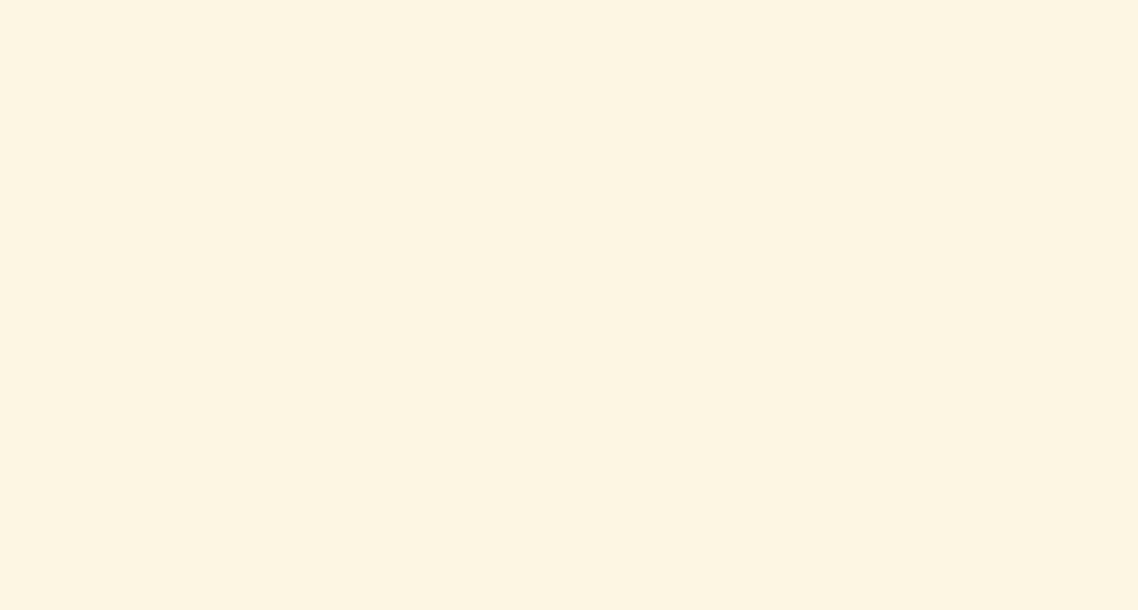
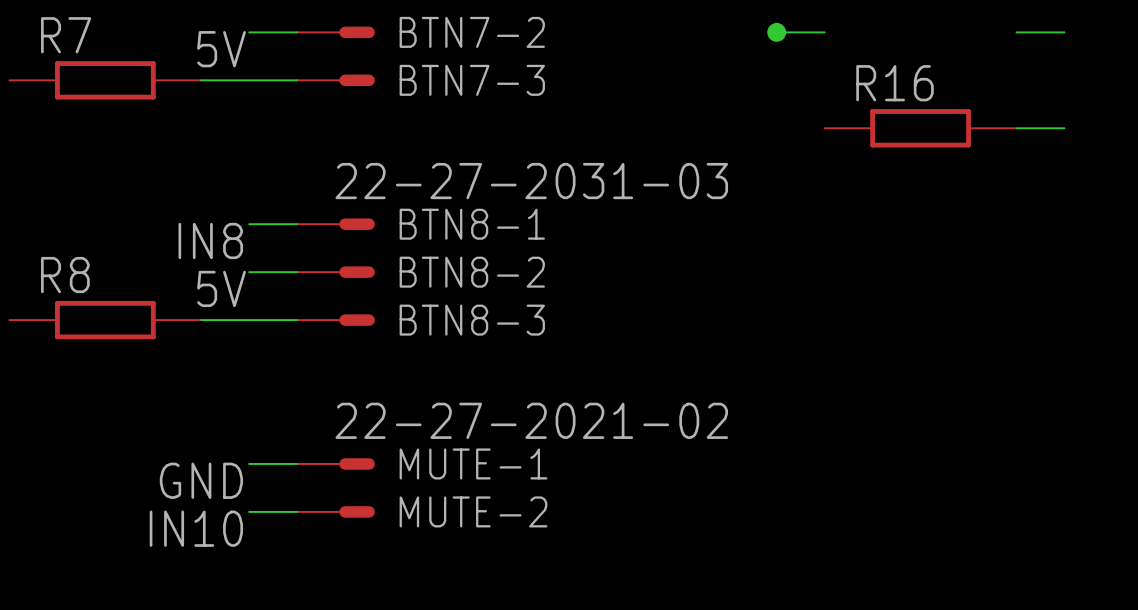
wire: none -> (249, 32) (297, 32)
BTN7-2: none -> (336, 32)
wire: none -> (776, 32) (824, 32)
junction: none -> (776, 32)
wire: none -> (1016, 32) (1064, 32)
label: none -> 5V (221, 49)
R7: none -> (105, 80)
wire: none -> (201, 80) (297, 80)
BTN7-3: none -> (336, 80)
R16: none -> (920, 128)
wire: none -> (1016, 128) (1064, 128)
wire: none -> (249, 224) (297, 224)
BTN8-1: none -> 22-27-2031-03 (336, 224)
label: none -> IN8 (210, 240)
wire: none -> (249, 272) (297, 272)
BTN8-2: none -> (336, 272)
label: none -> 5V (221, 288)
R8: none -> (105, 320)
wire: none -> (201, 320) (297, 320)
BTN8-3: none -> (336, 320)
wire: none -> (249, 463) (297, 463)
MUTE-1: none -> 22-27-2021-02 (336, 463)
label: none -> GND (201, 480)
wire: none -> (249, 511) (297, 511)
MUTE-2: none -> (336, 511)
label: none -> IN10 (196, 528)

